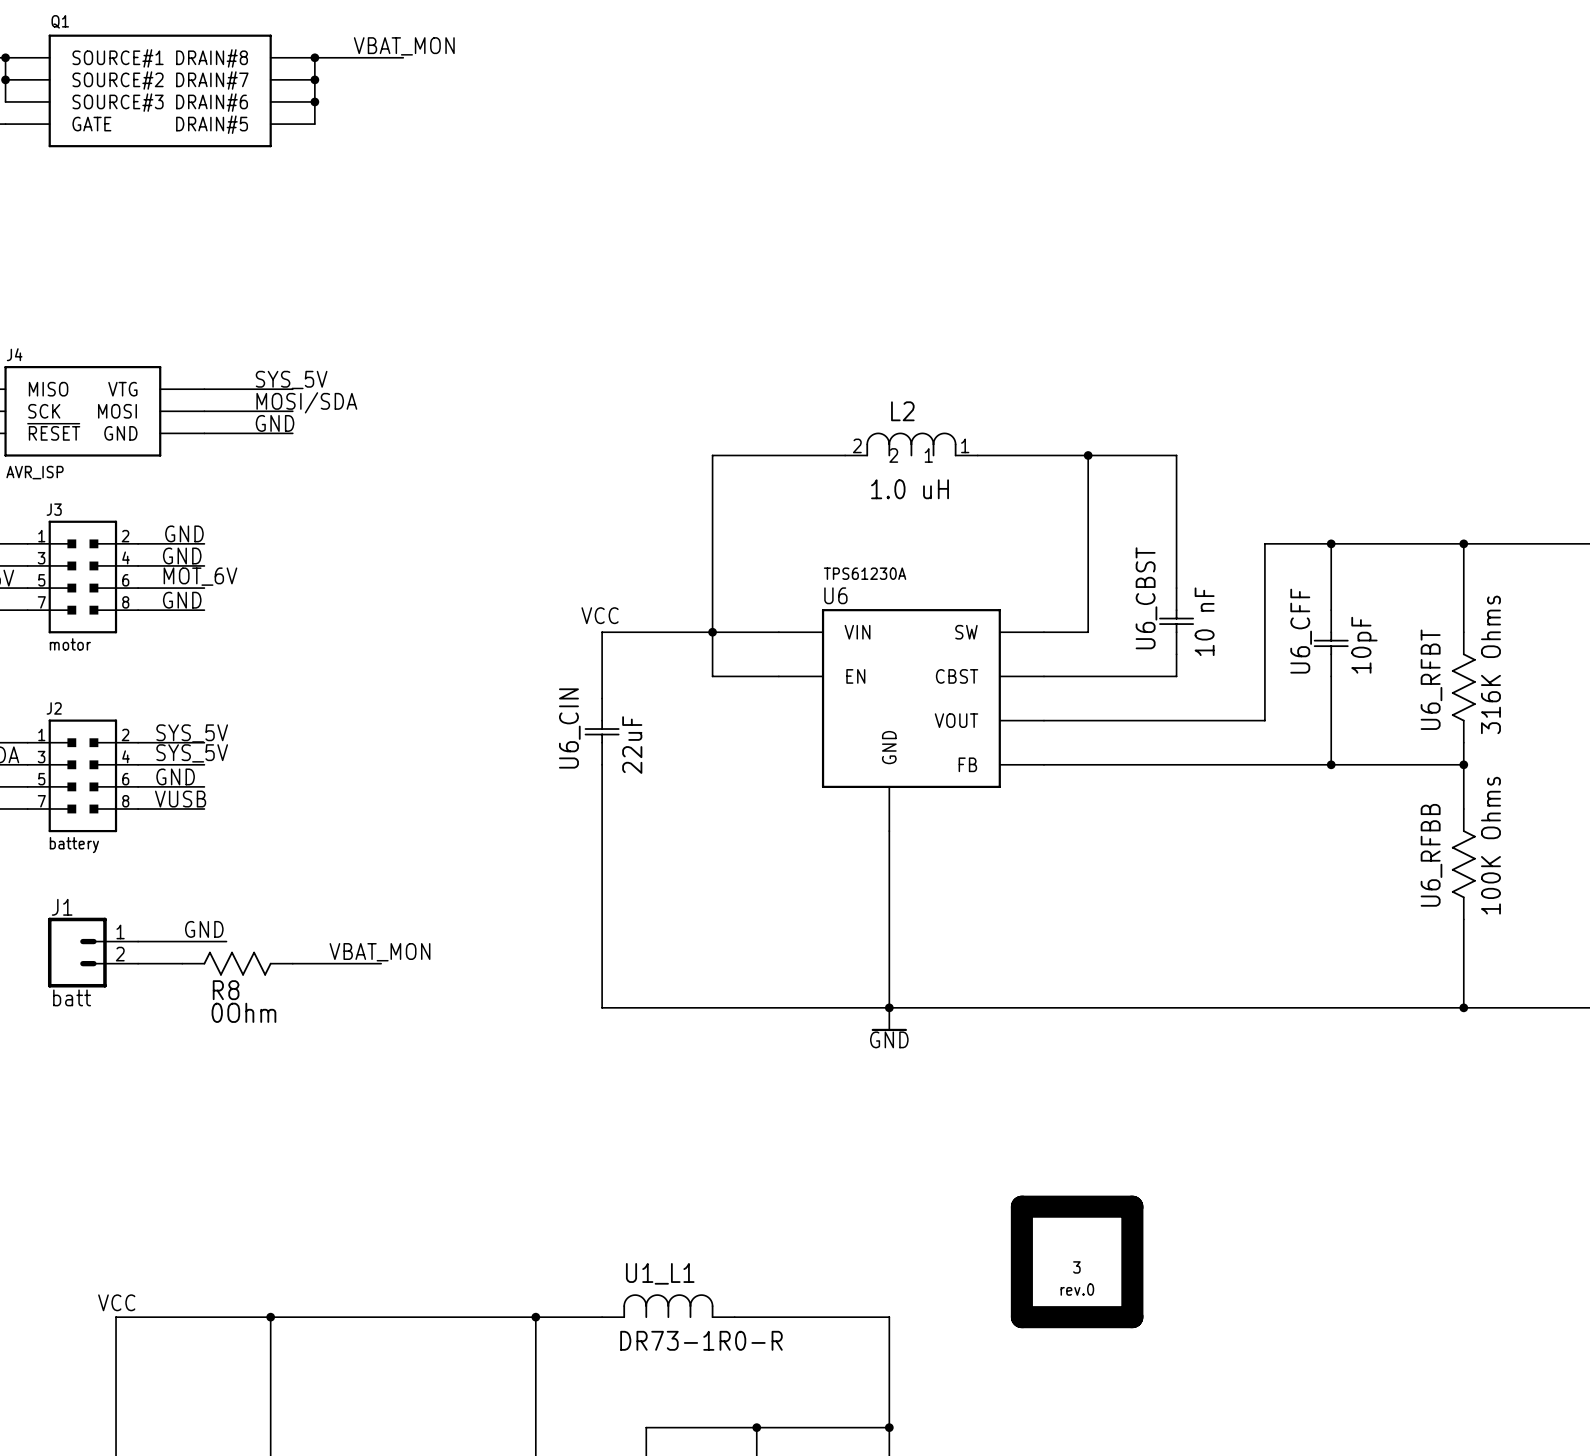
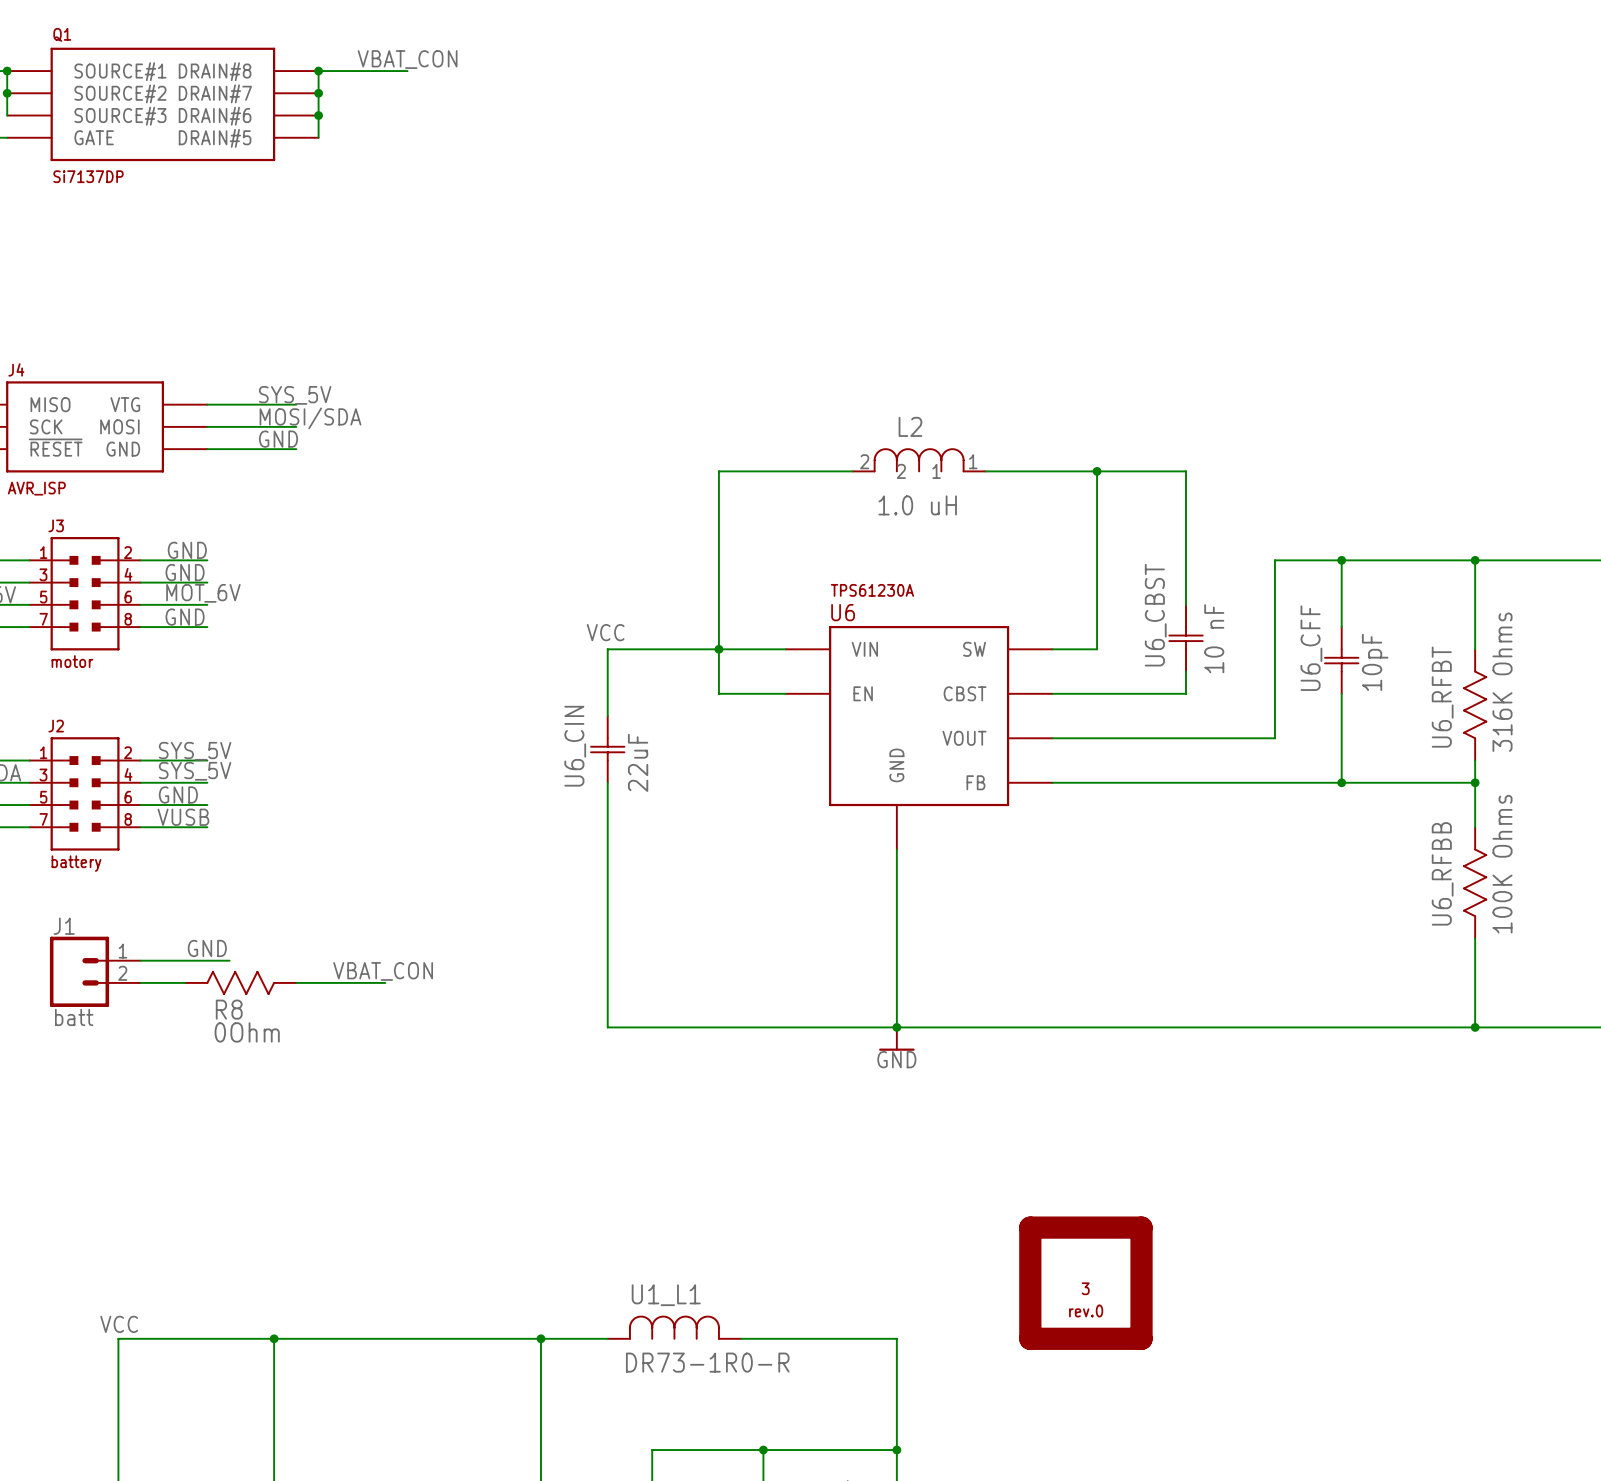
label: VBAT_MON (404, 46) -> VBAT_CON (407, 59)
Q1 value: none -> Si7137DP (88, 176)
label: VBAT_MON (379, 952) -> VBAT_CON (383, 971)

